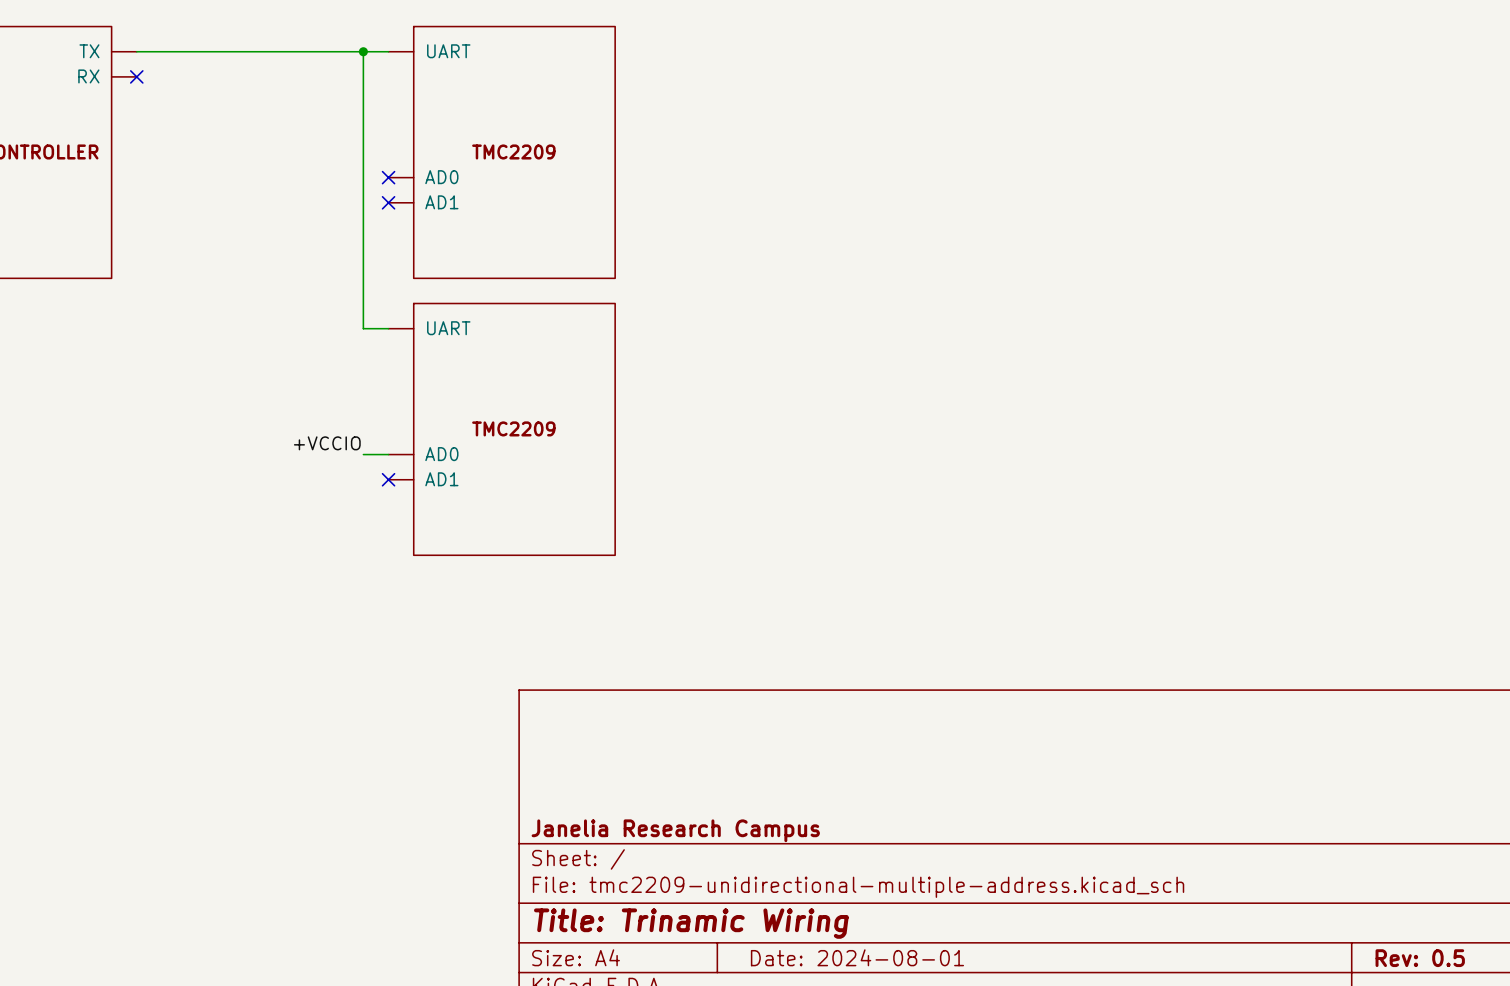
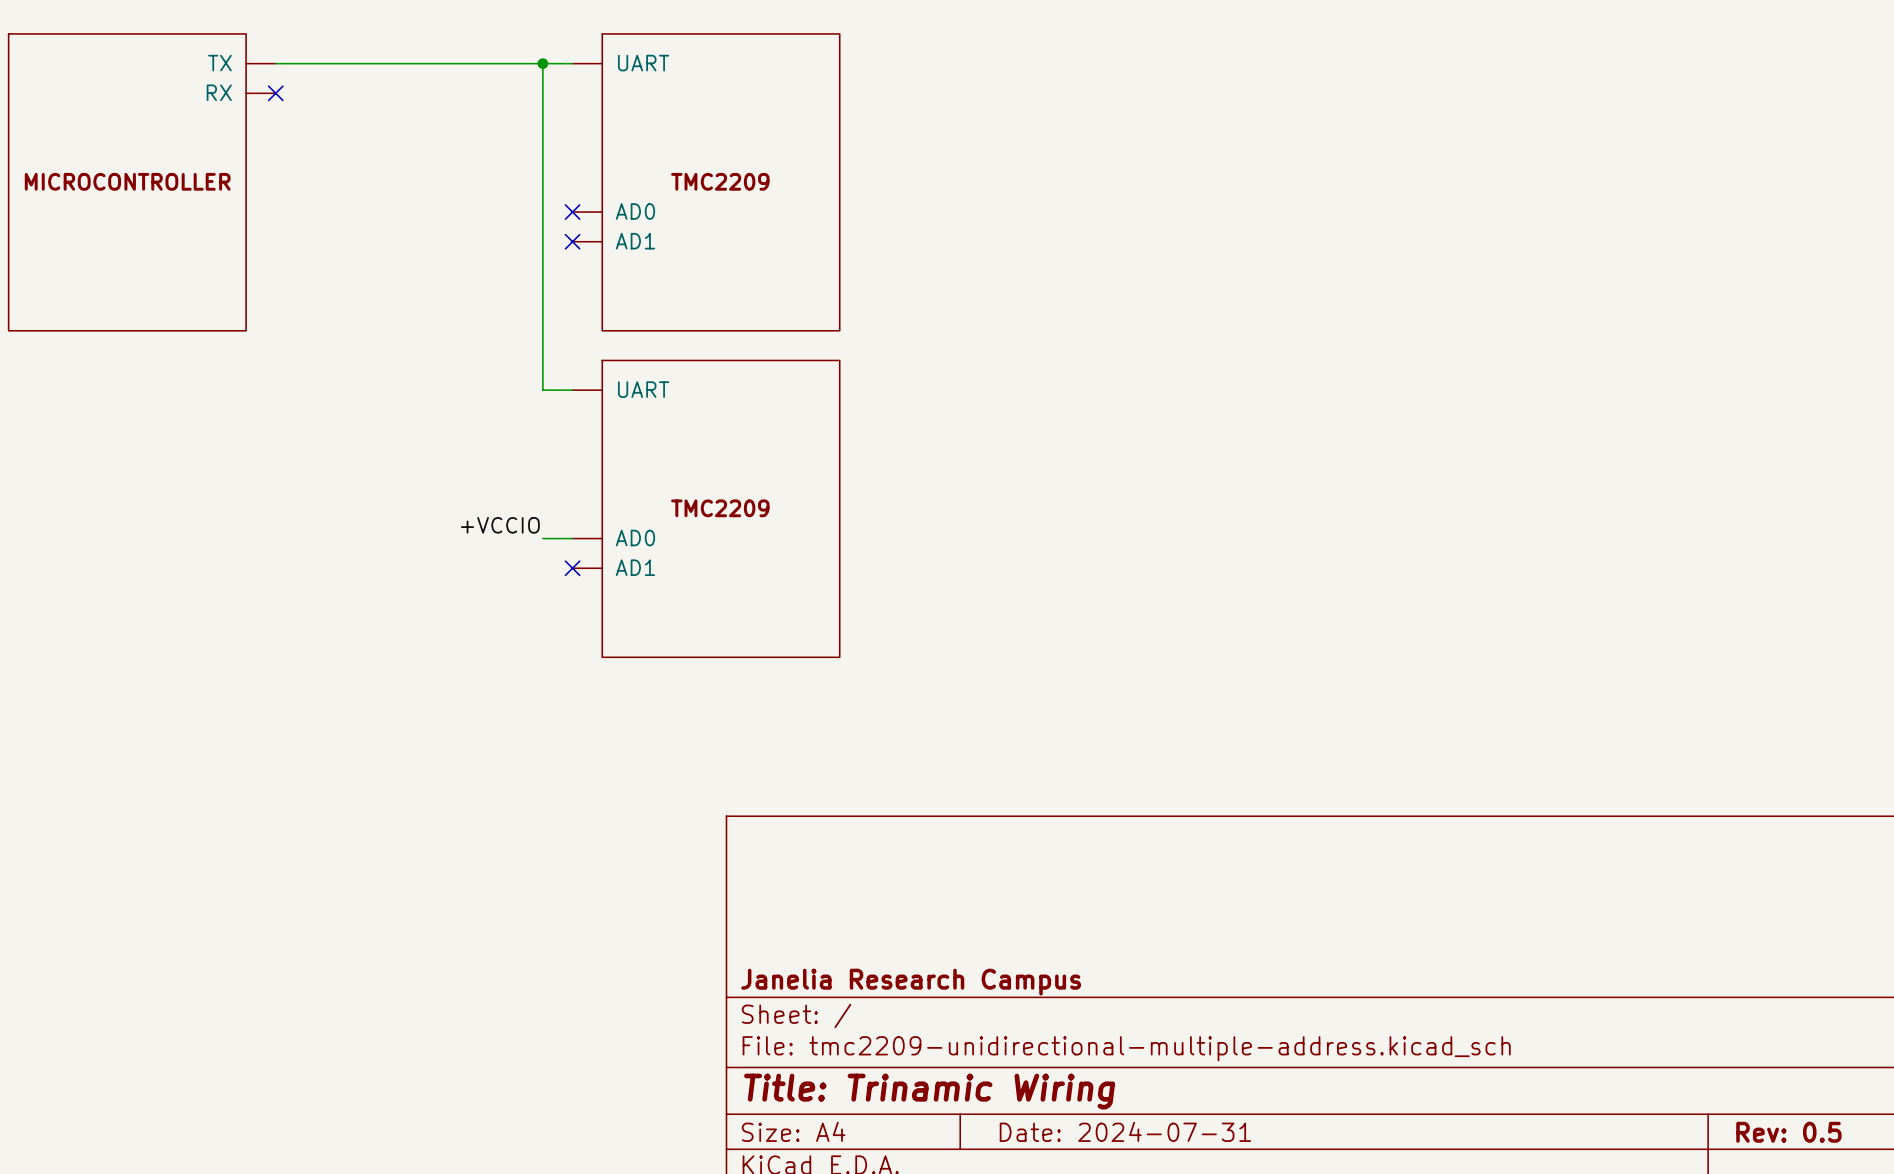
title block: Date: 2024-08-01 (857, 957) -> Date: 2024-07-31 (1125, 1131)

